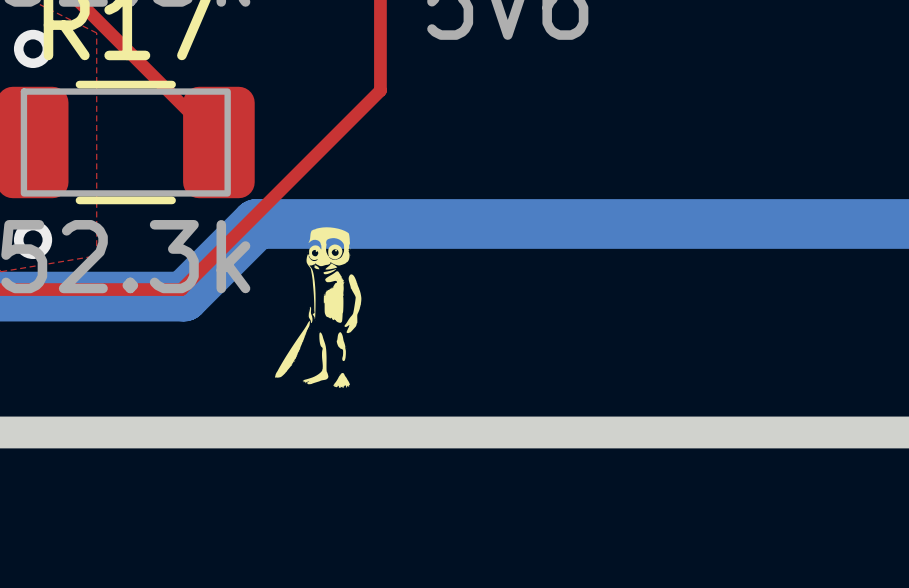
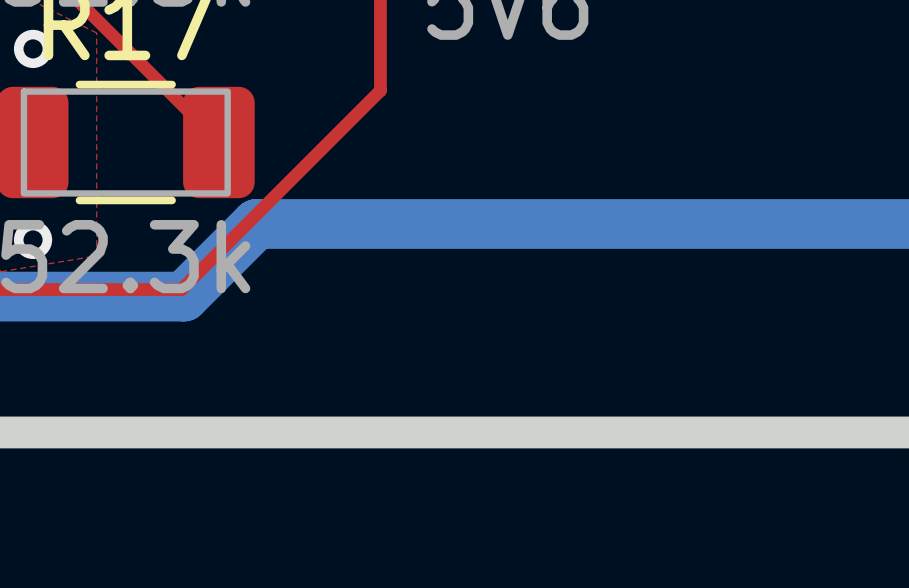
drawing: [275, 227, 362, 388] -> none

